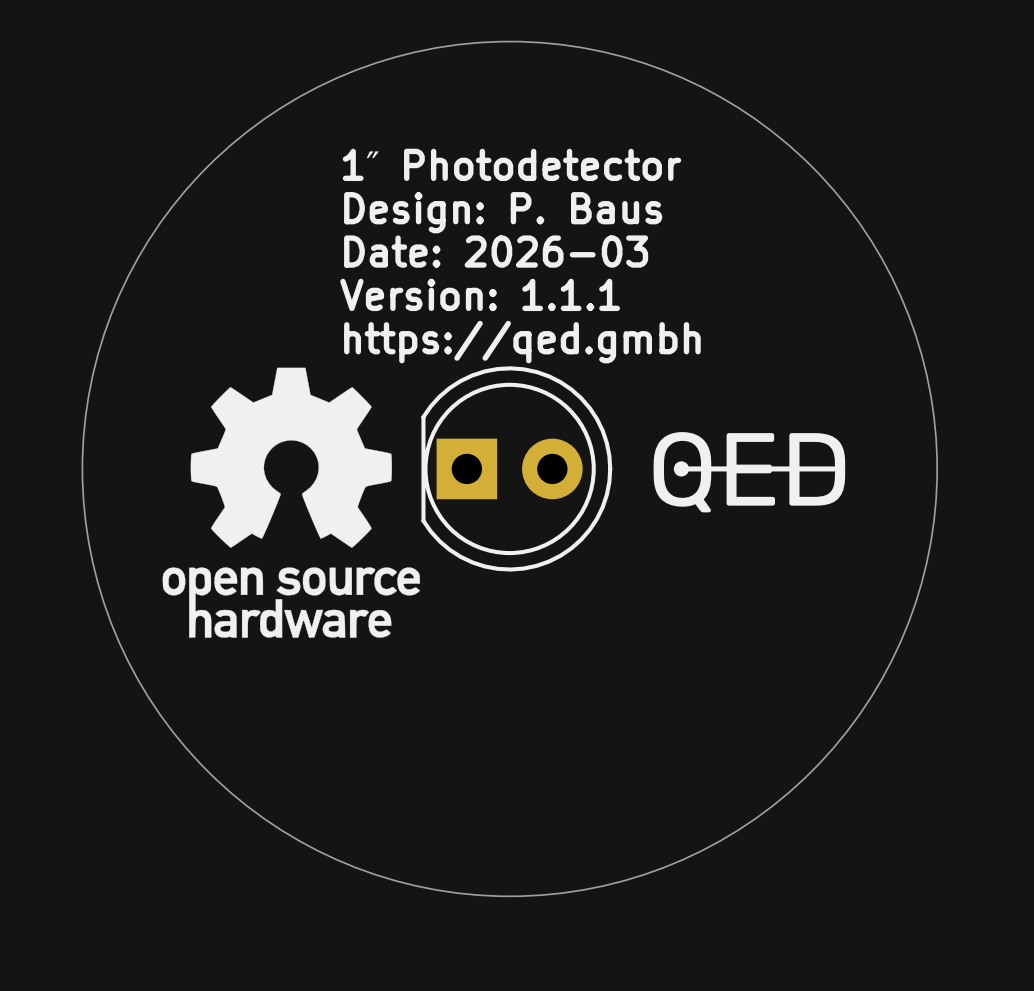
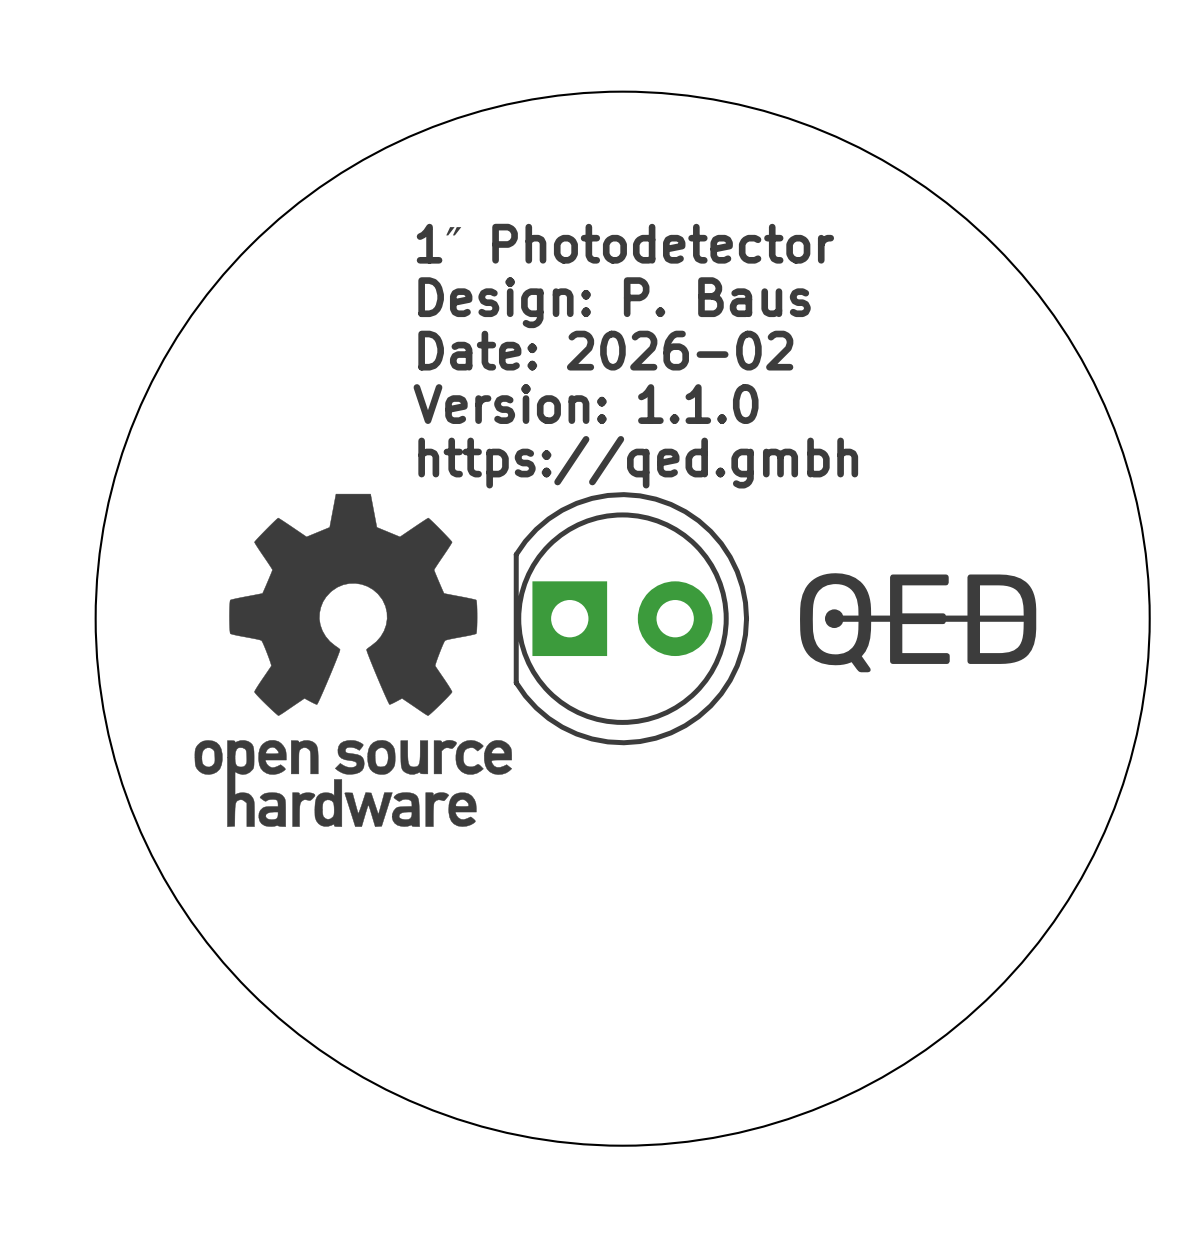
text: Date: 2026-03 (496, 251) -> Date: 2026-02 (605, 350)
text: Version: 1.1.1 (480, 294) -> Version: 1.1.0 (586, 404)

